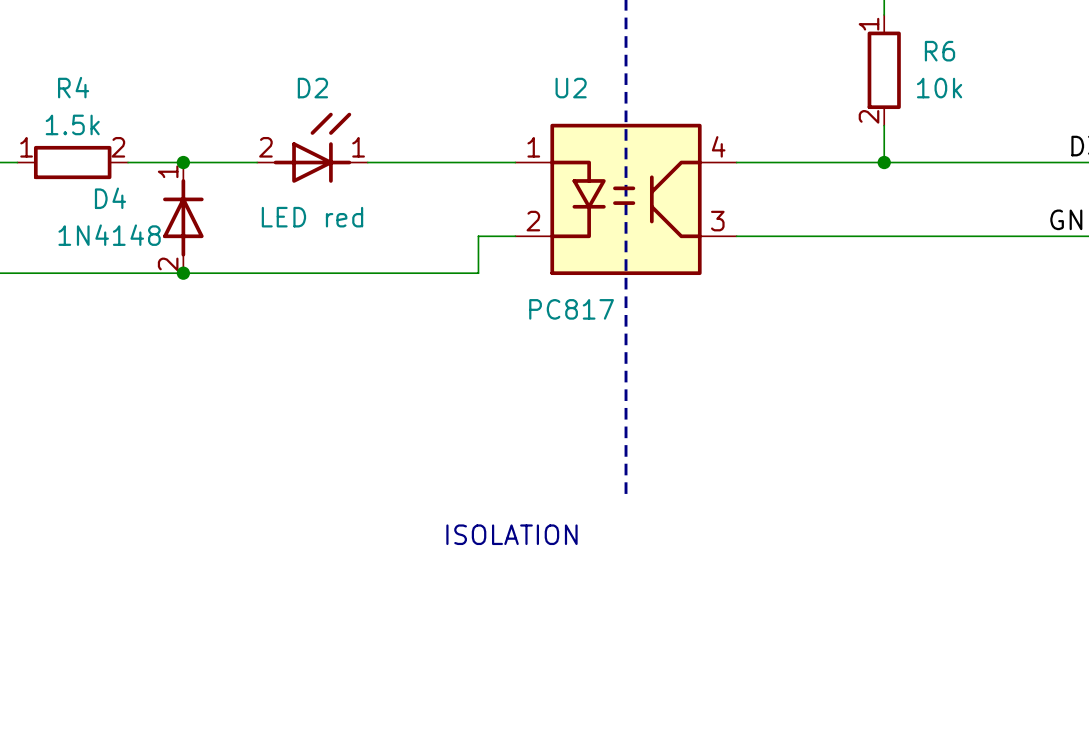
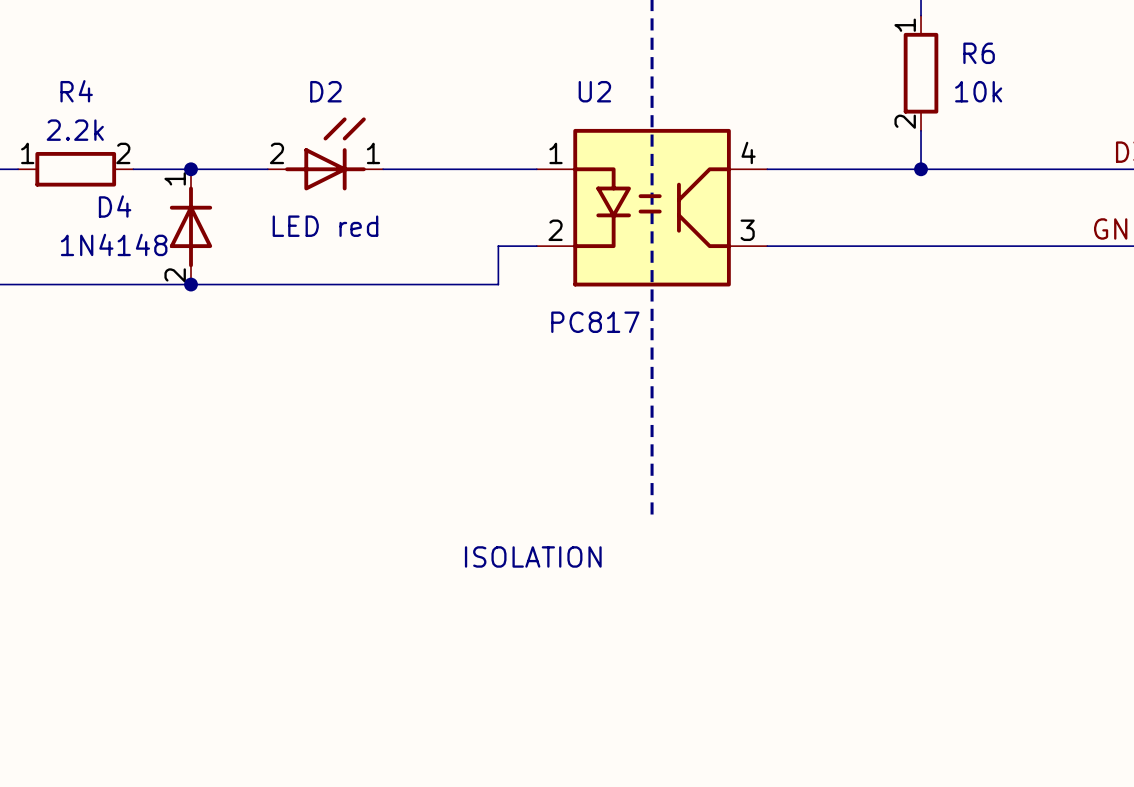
R4 value: 1.5k (72, 124) -> 2.2k (75, 130)

